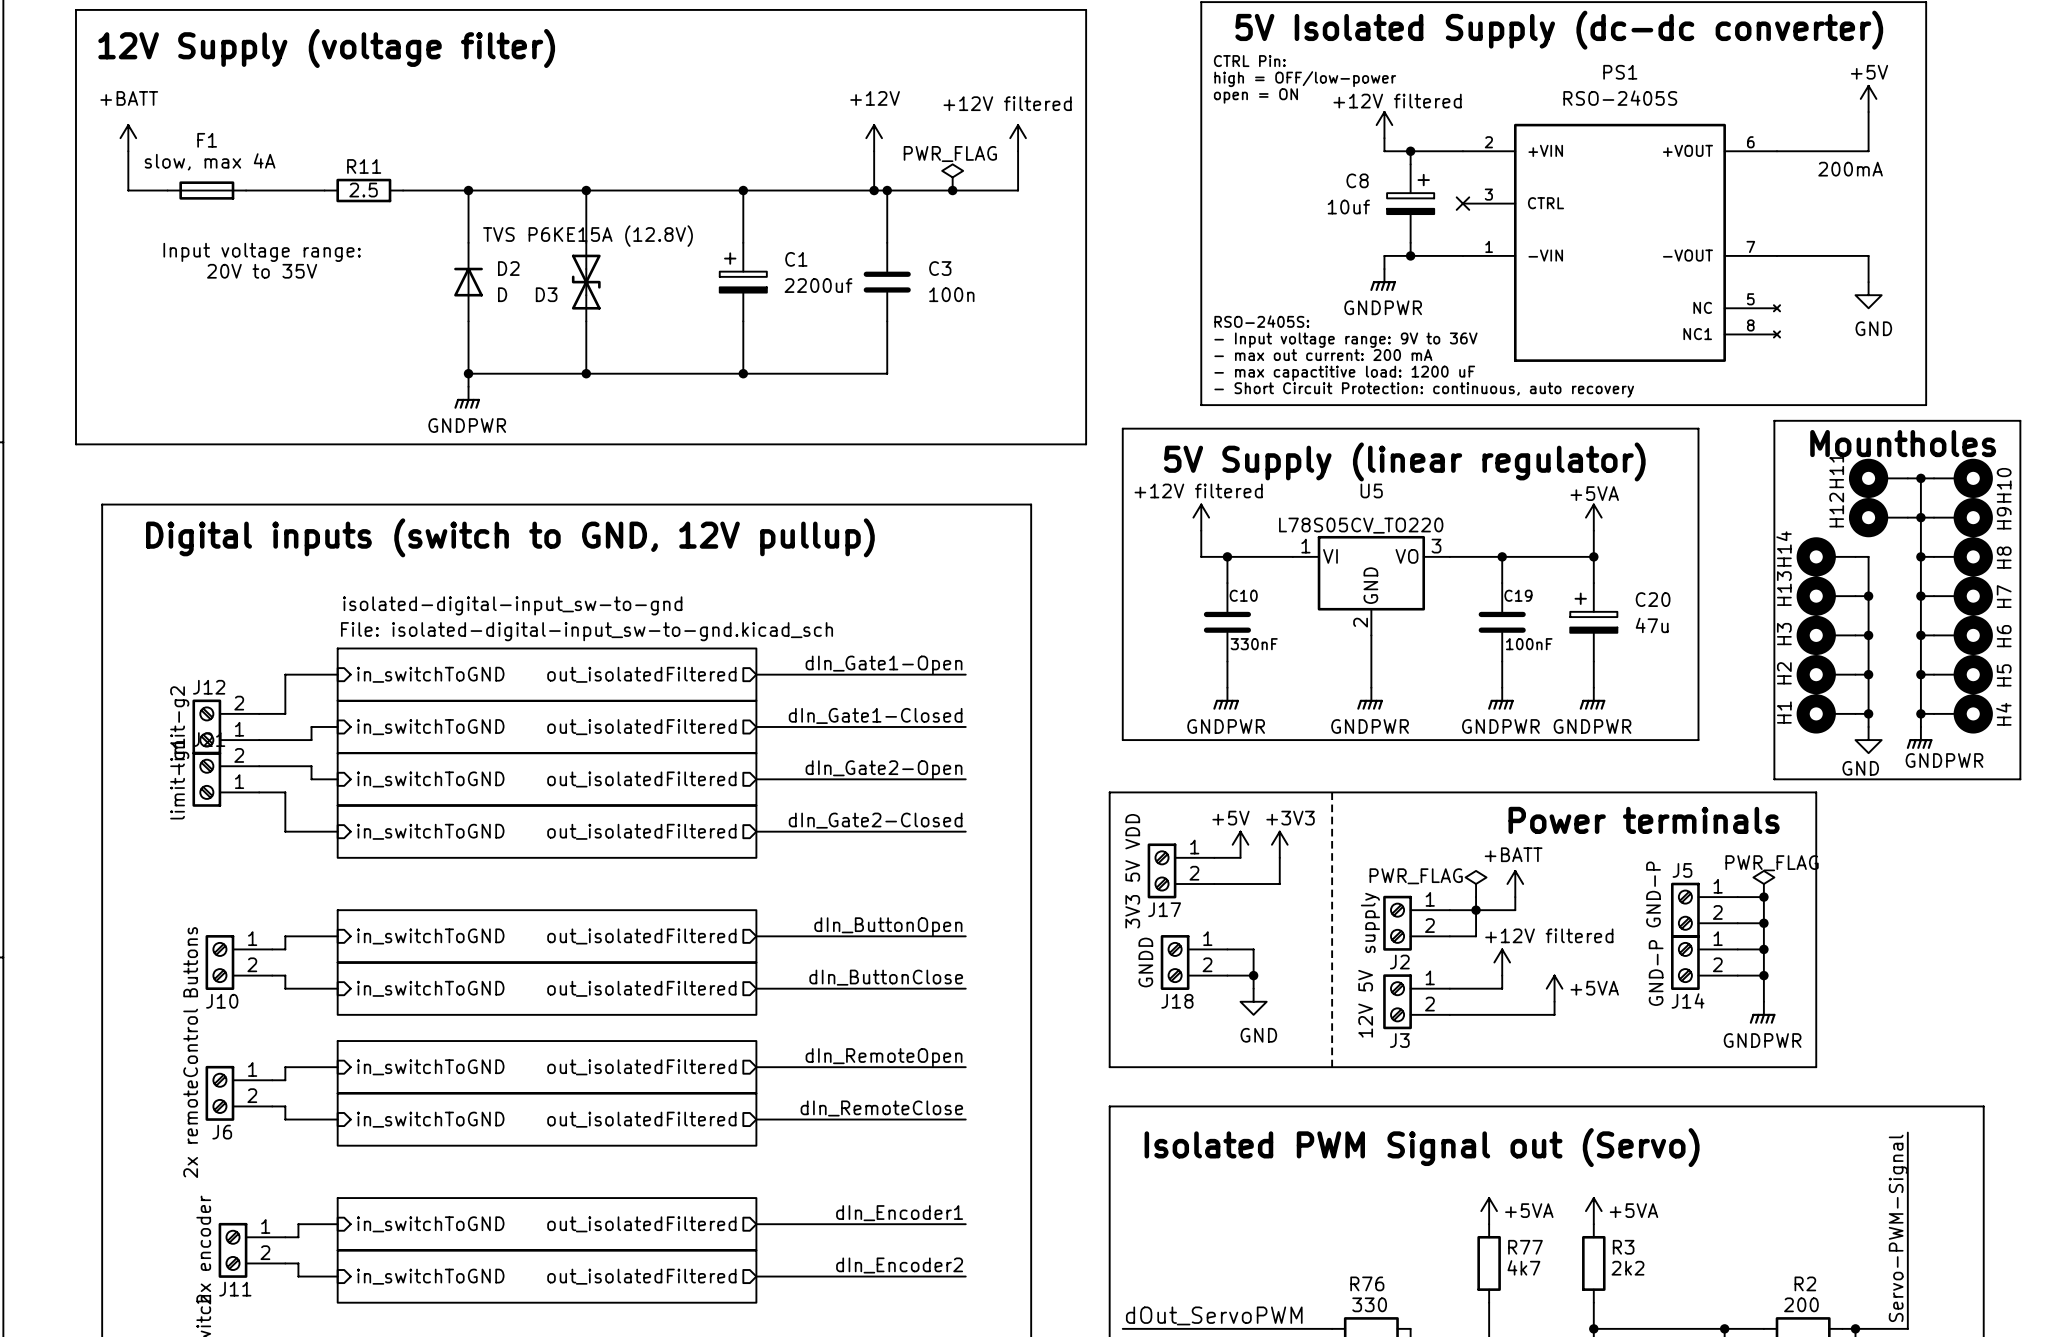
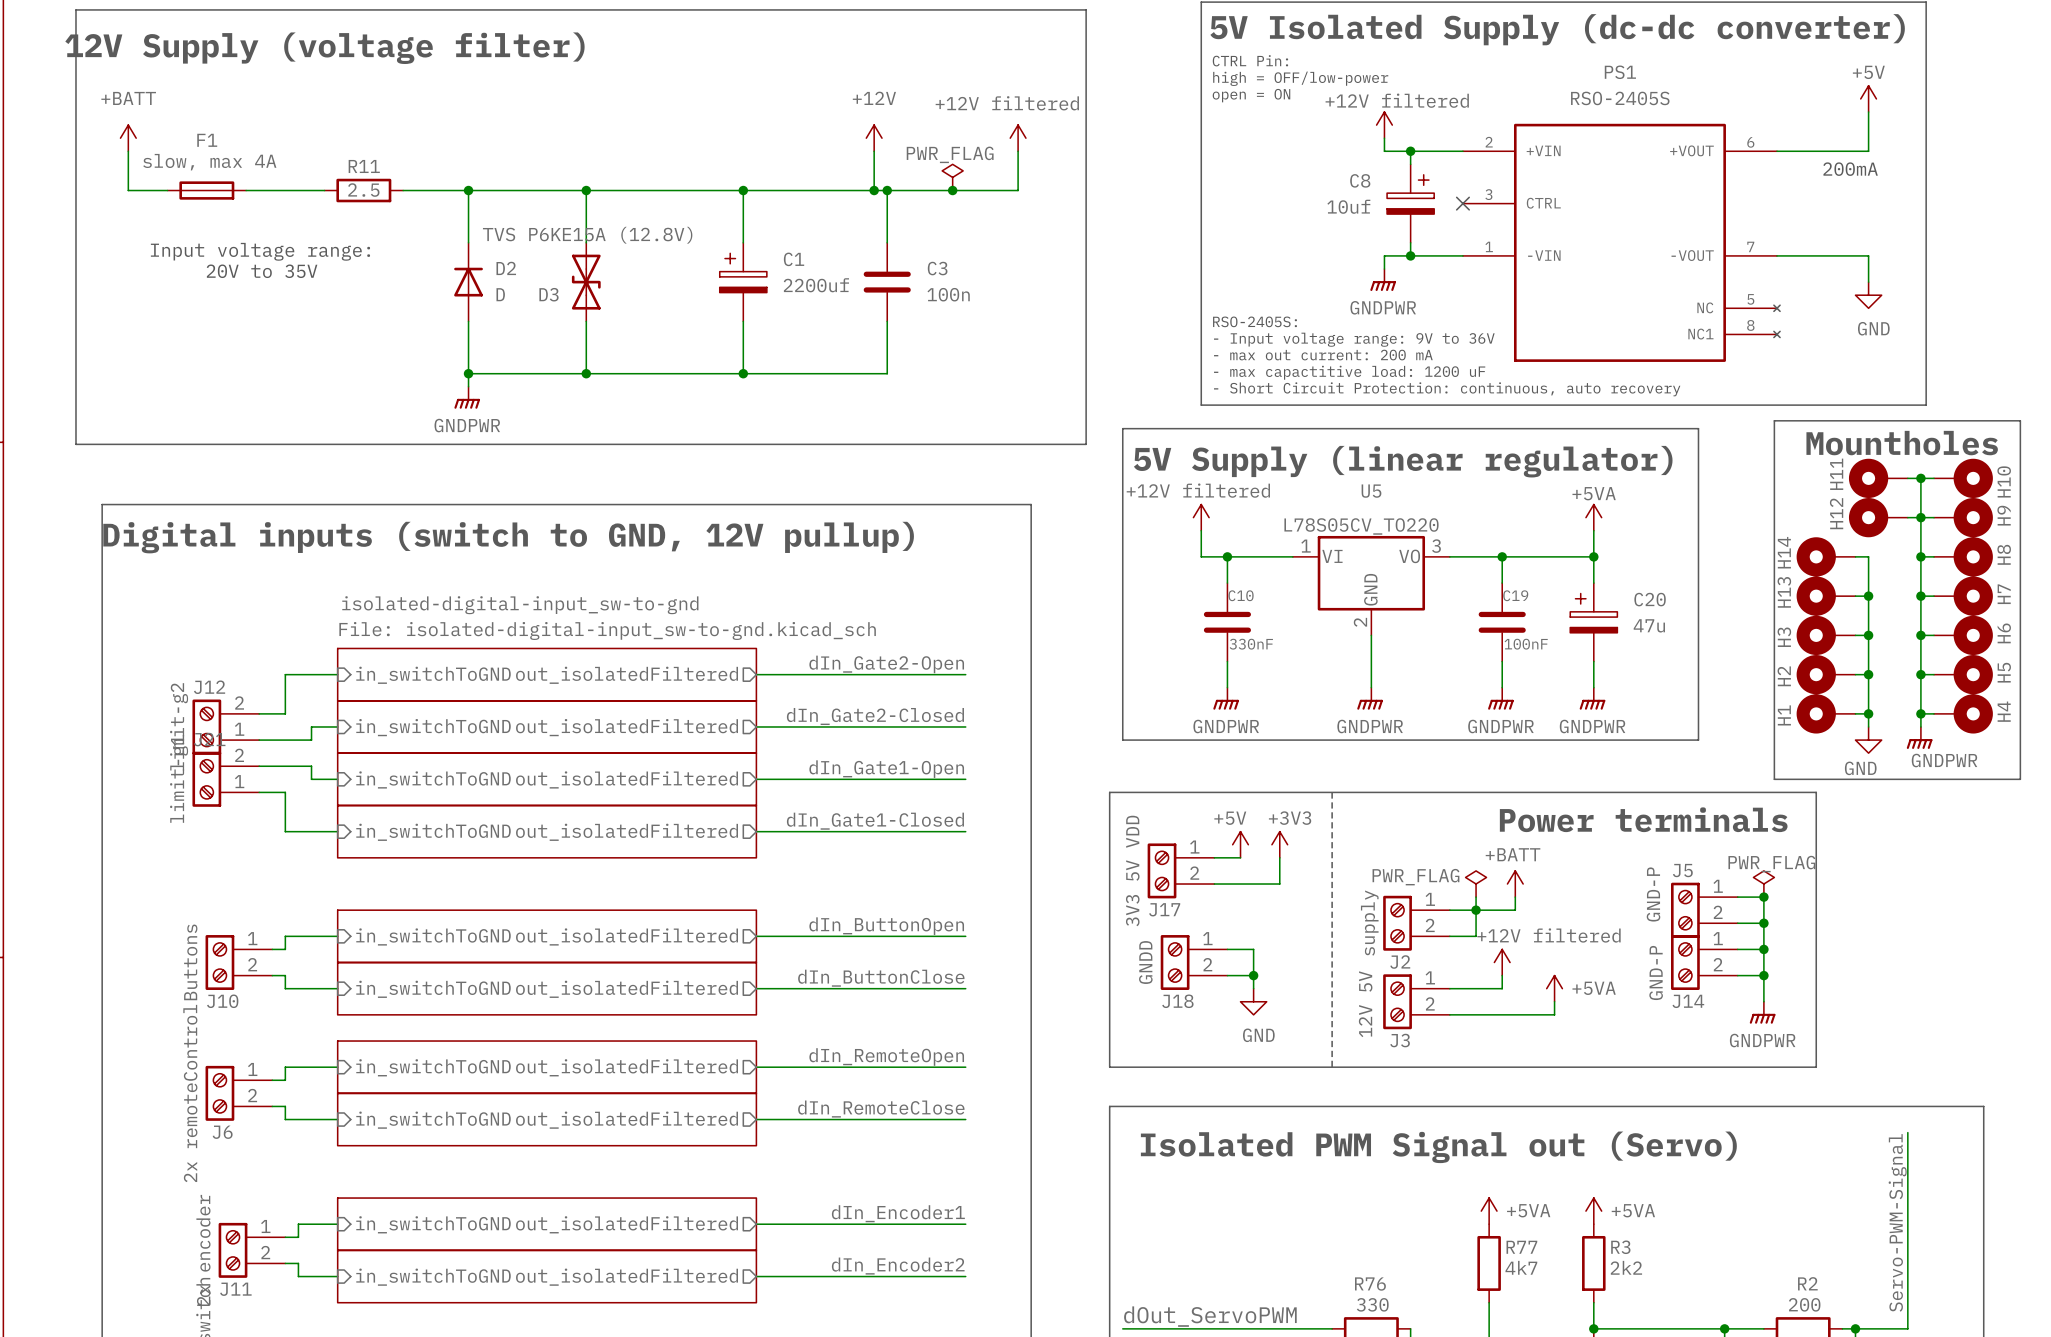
label: dIn_Gate1-Open (884, 665) -> dIn_Gate2-Open (886, 664)
label: dIn_Gate1-Closed (875, 715) -> dIn_Gate2-Closed (875, 716)
label: dIn_Gate2-Open (884, 769) -> dIn_Gate1-Open (886, 769)
label: dIn_Gate2-Closed (875, 820) -> dIn_Gate1-Closed (875, 821)

